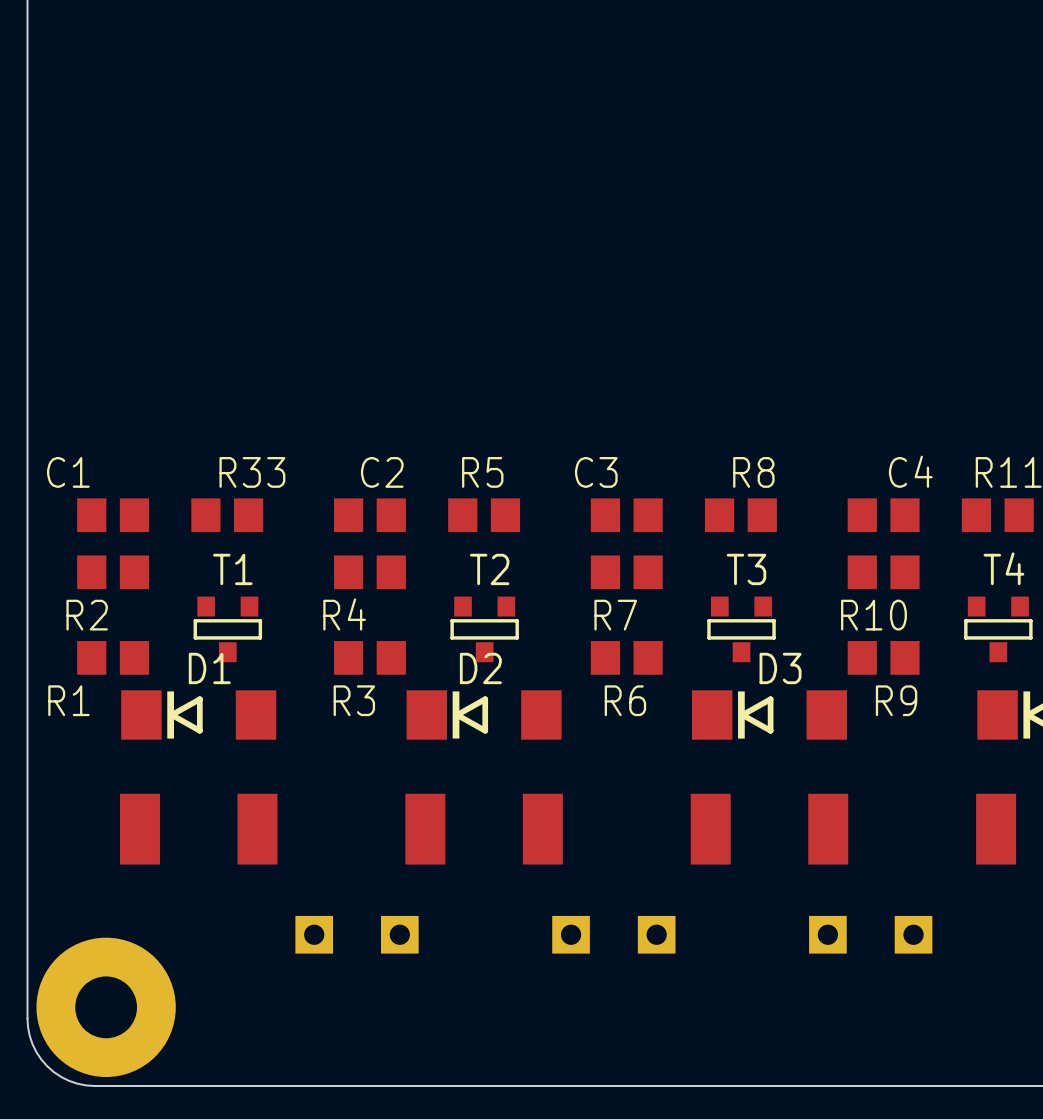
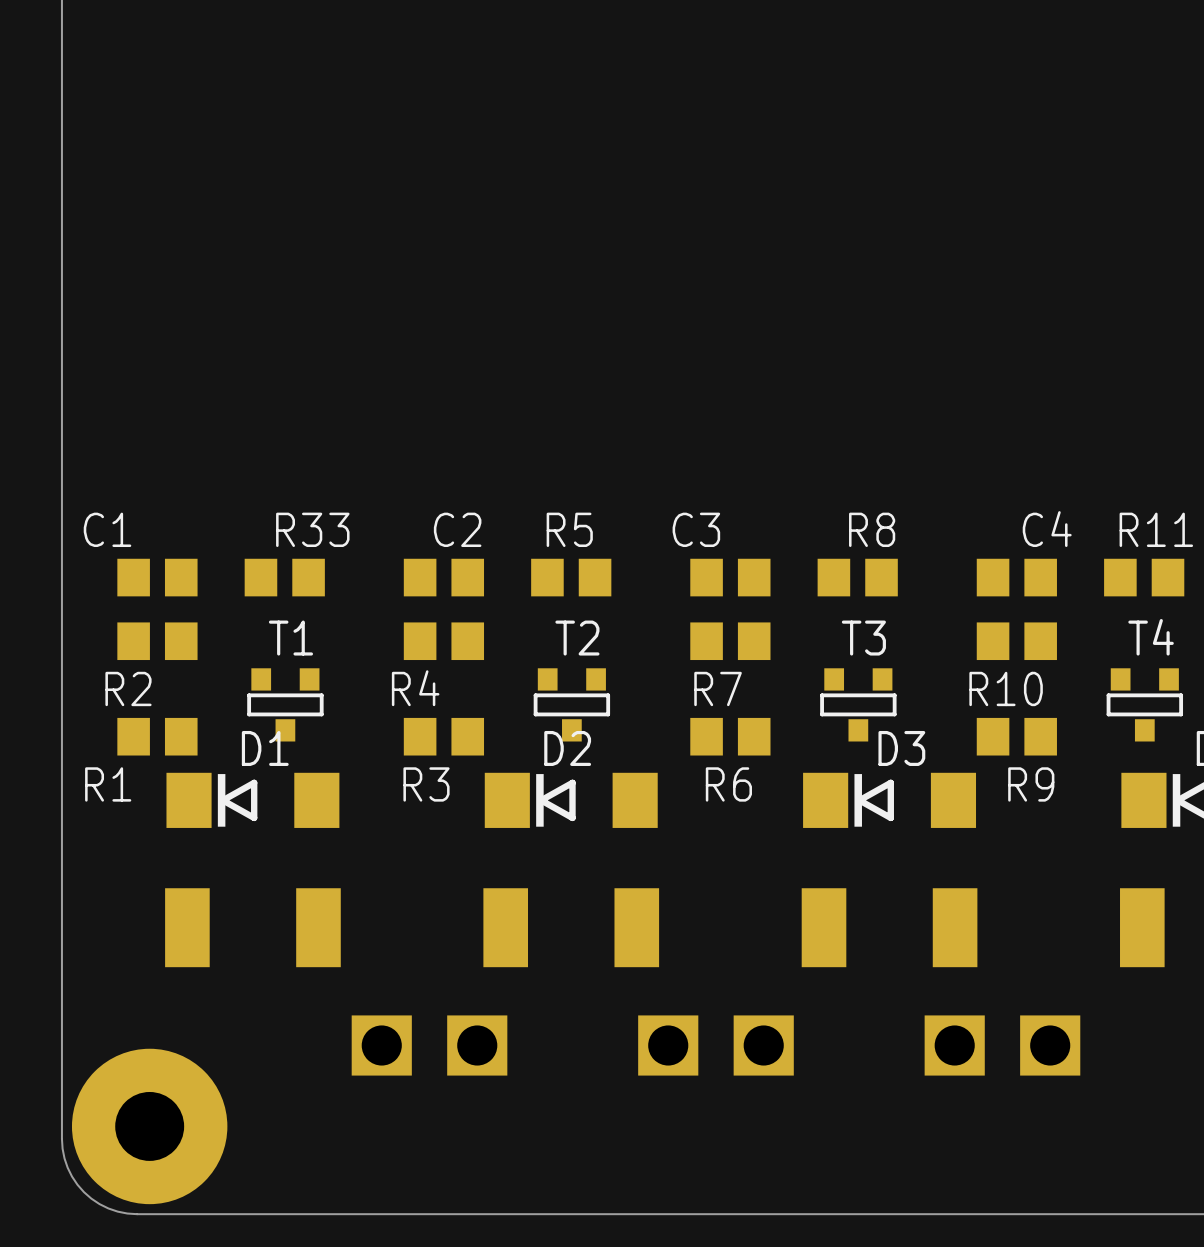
part footprint: [295, 915, 419, 954] -> [351, 1015, 508, 1076]
part footprint: [552, 915, 676, 954] -> [638, 1015, 794, 1076]
part footprint: [809, 915, 933, 954] -> [924, 1015, 1081, 1076]

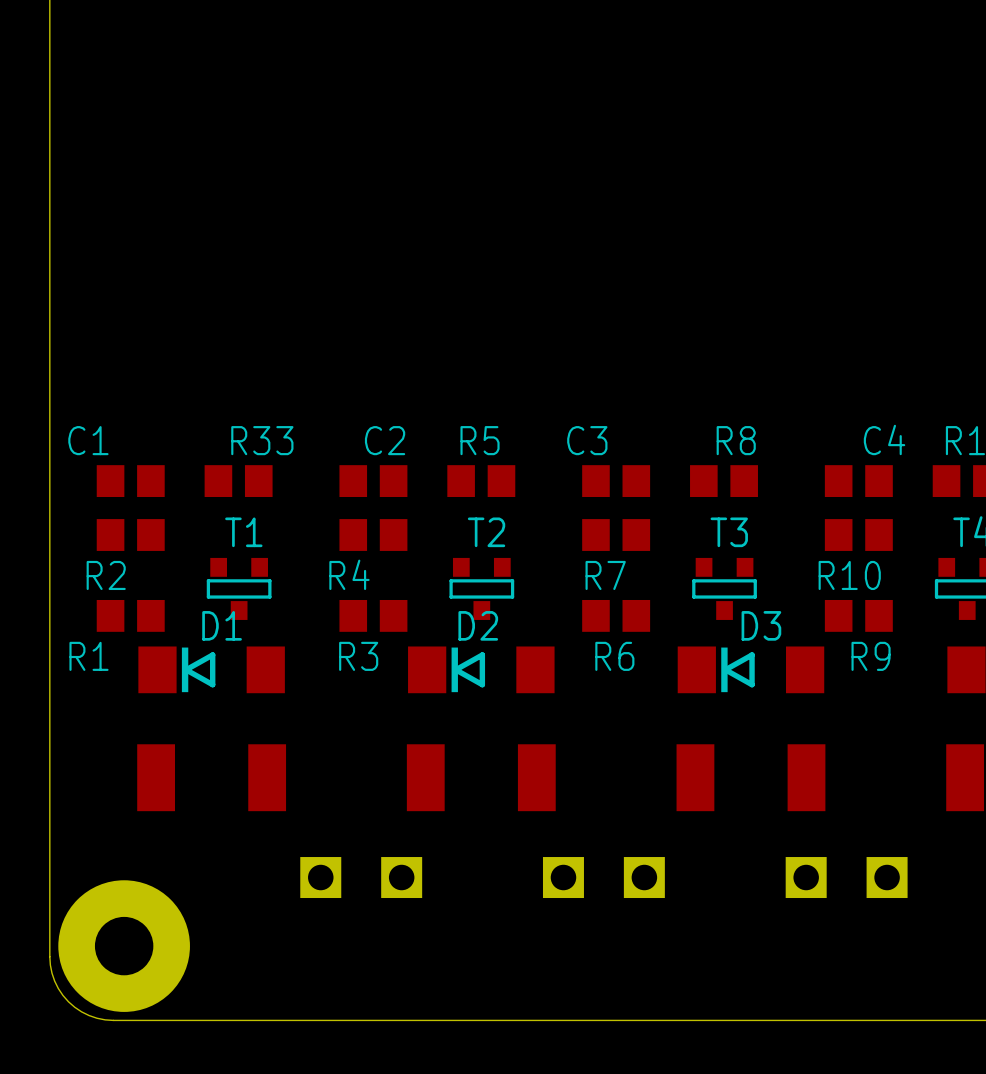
part footprint: [351, 1015, 508, 1076] -> [300, 857, 423, 899]
part footprint: [638, 1015, 794, 1076] -> [542, 857, 665, 899]
part footprint: [924, 1015, 1081, 1076] -> [785, 857, 908, 899]

